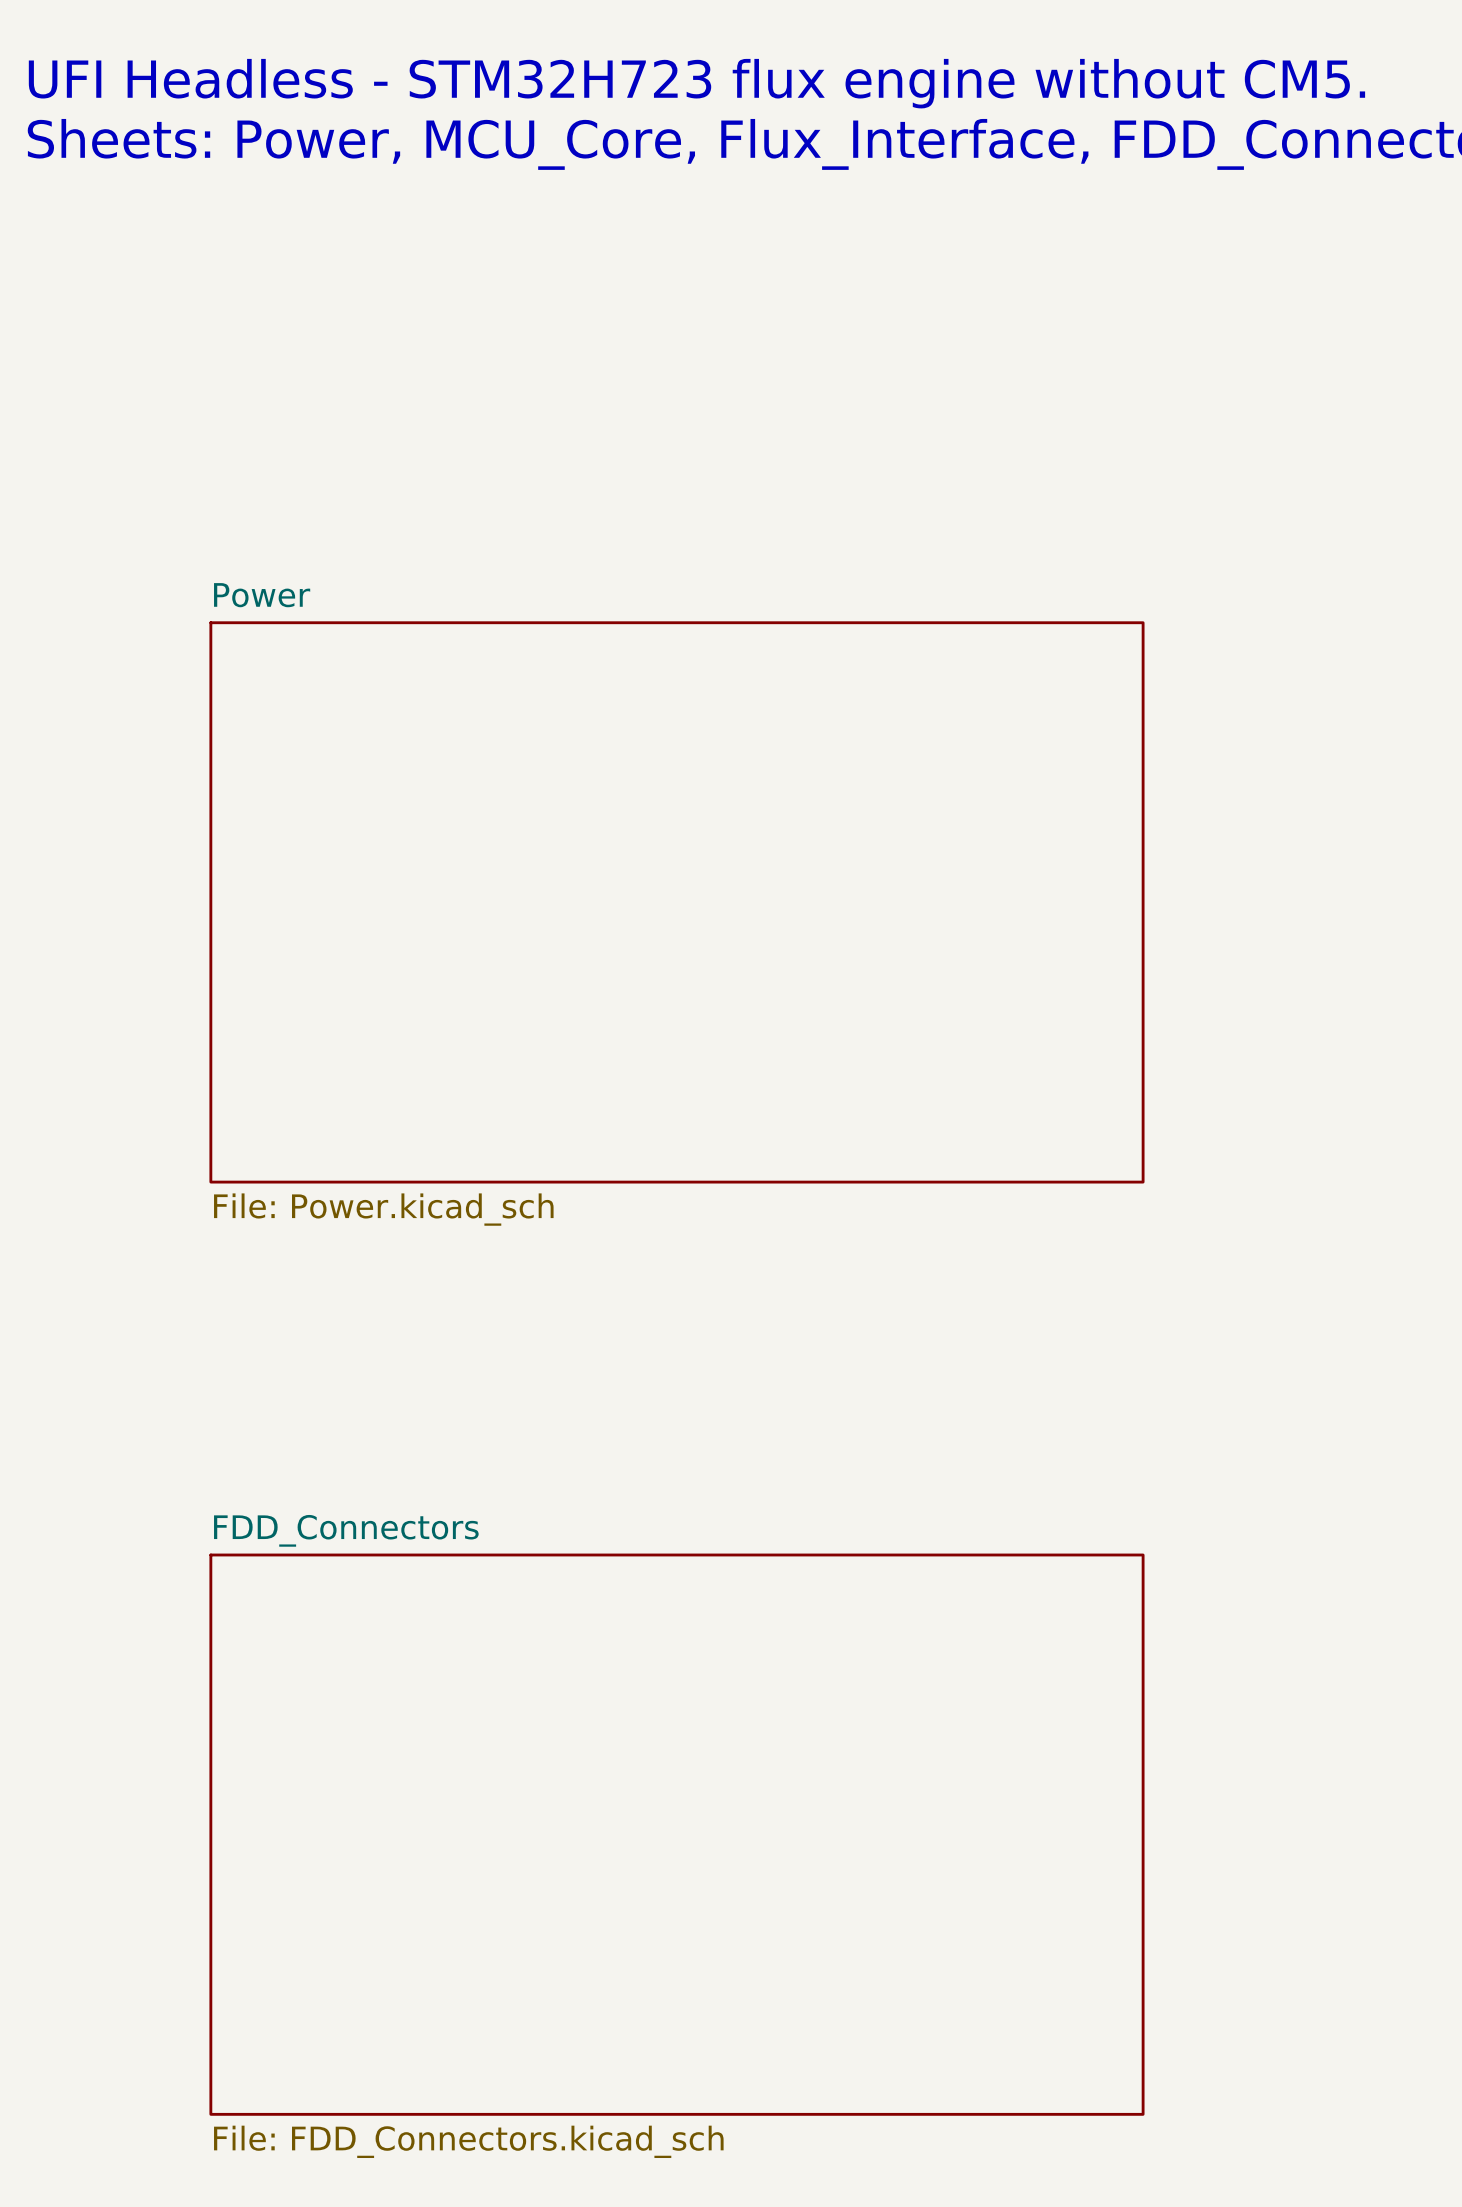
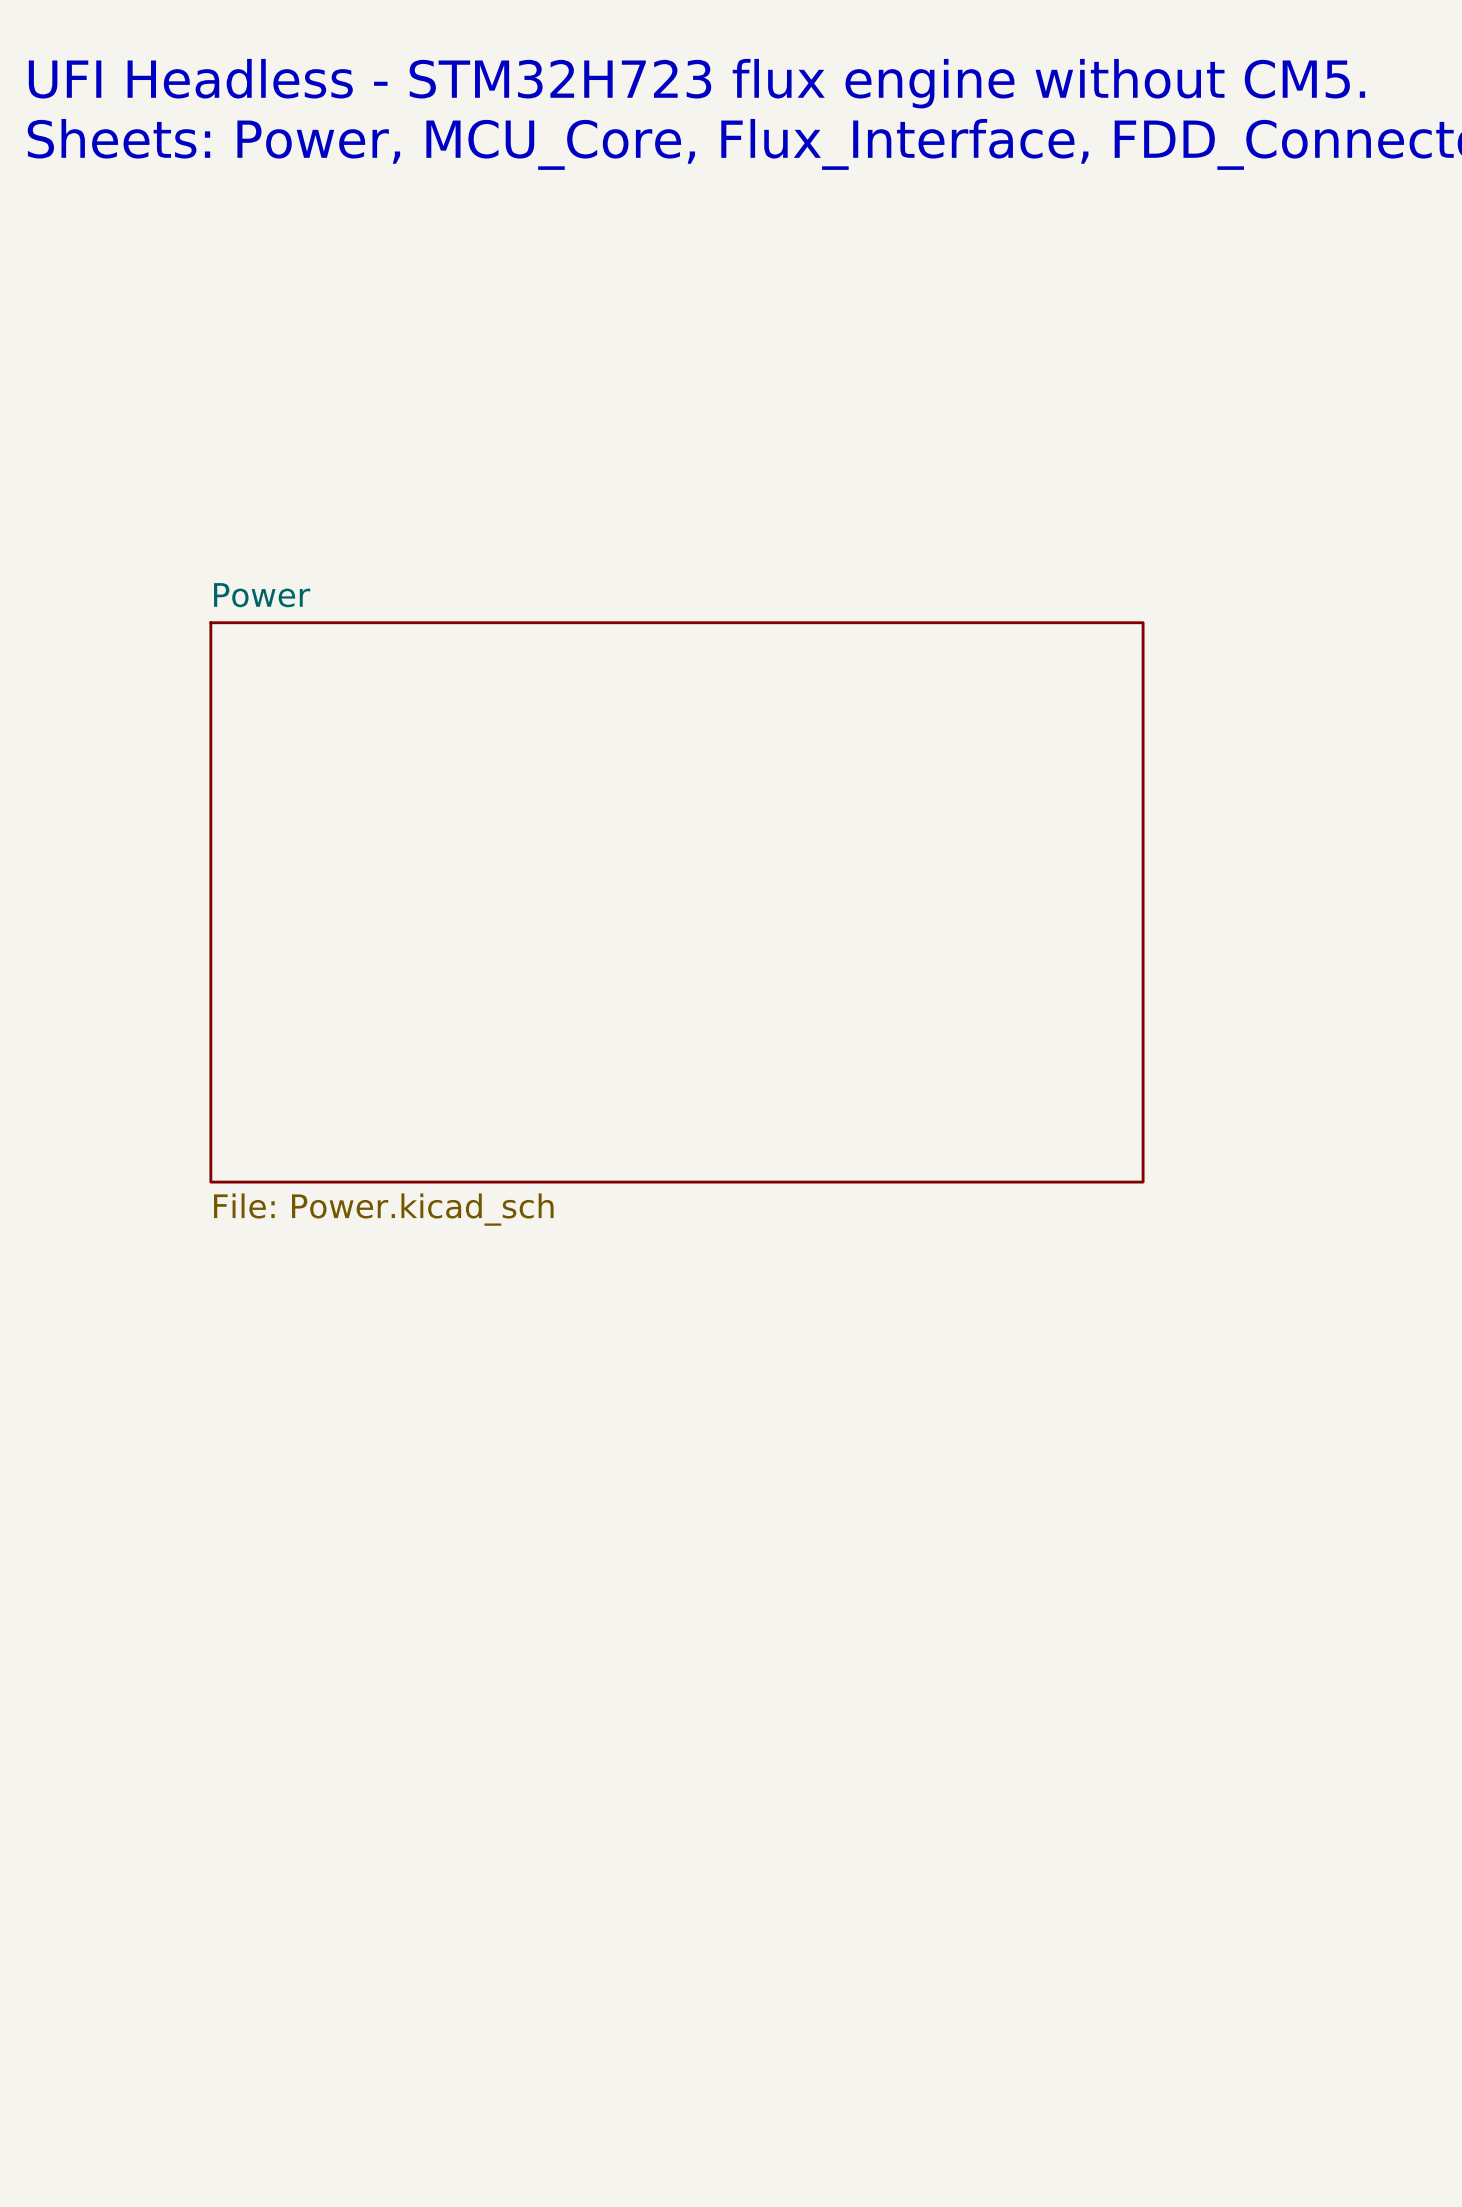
sheet FDD_Connectors: File: FDD_Connectors.kicad_sch (676, 1834) -> none

